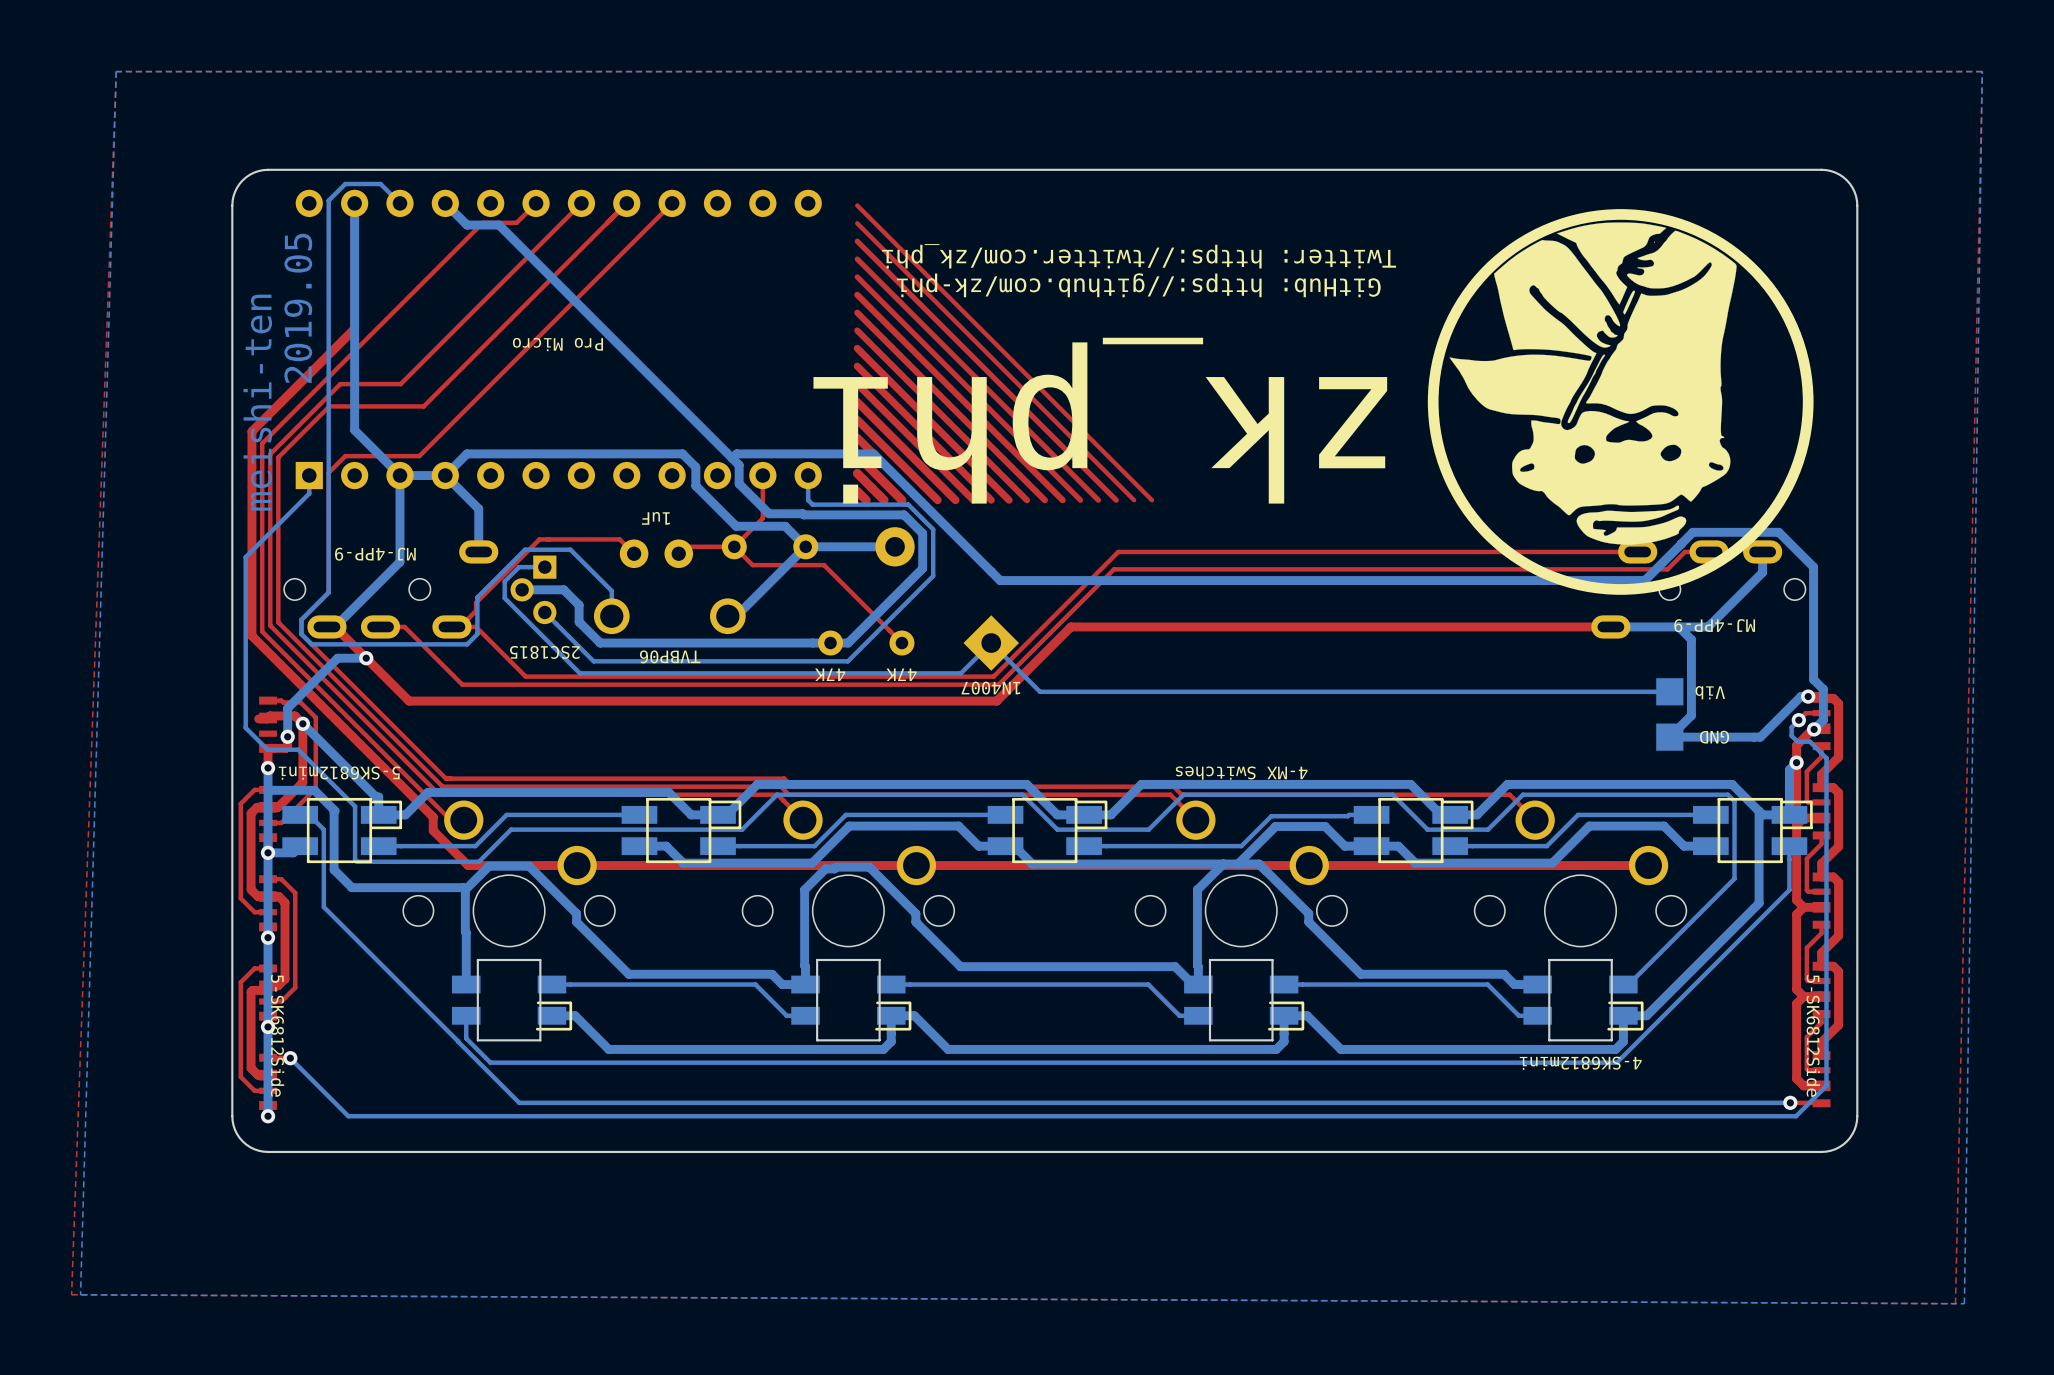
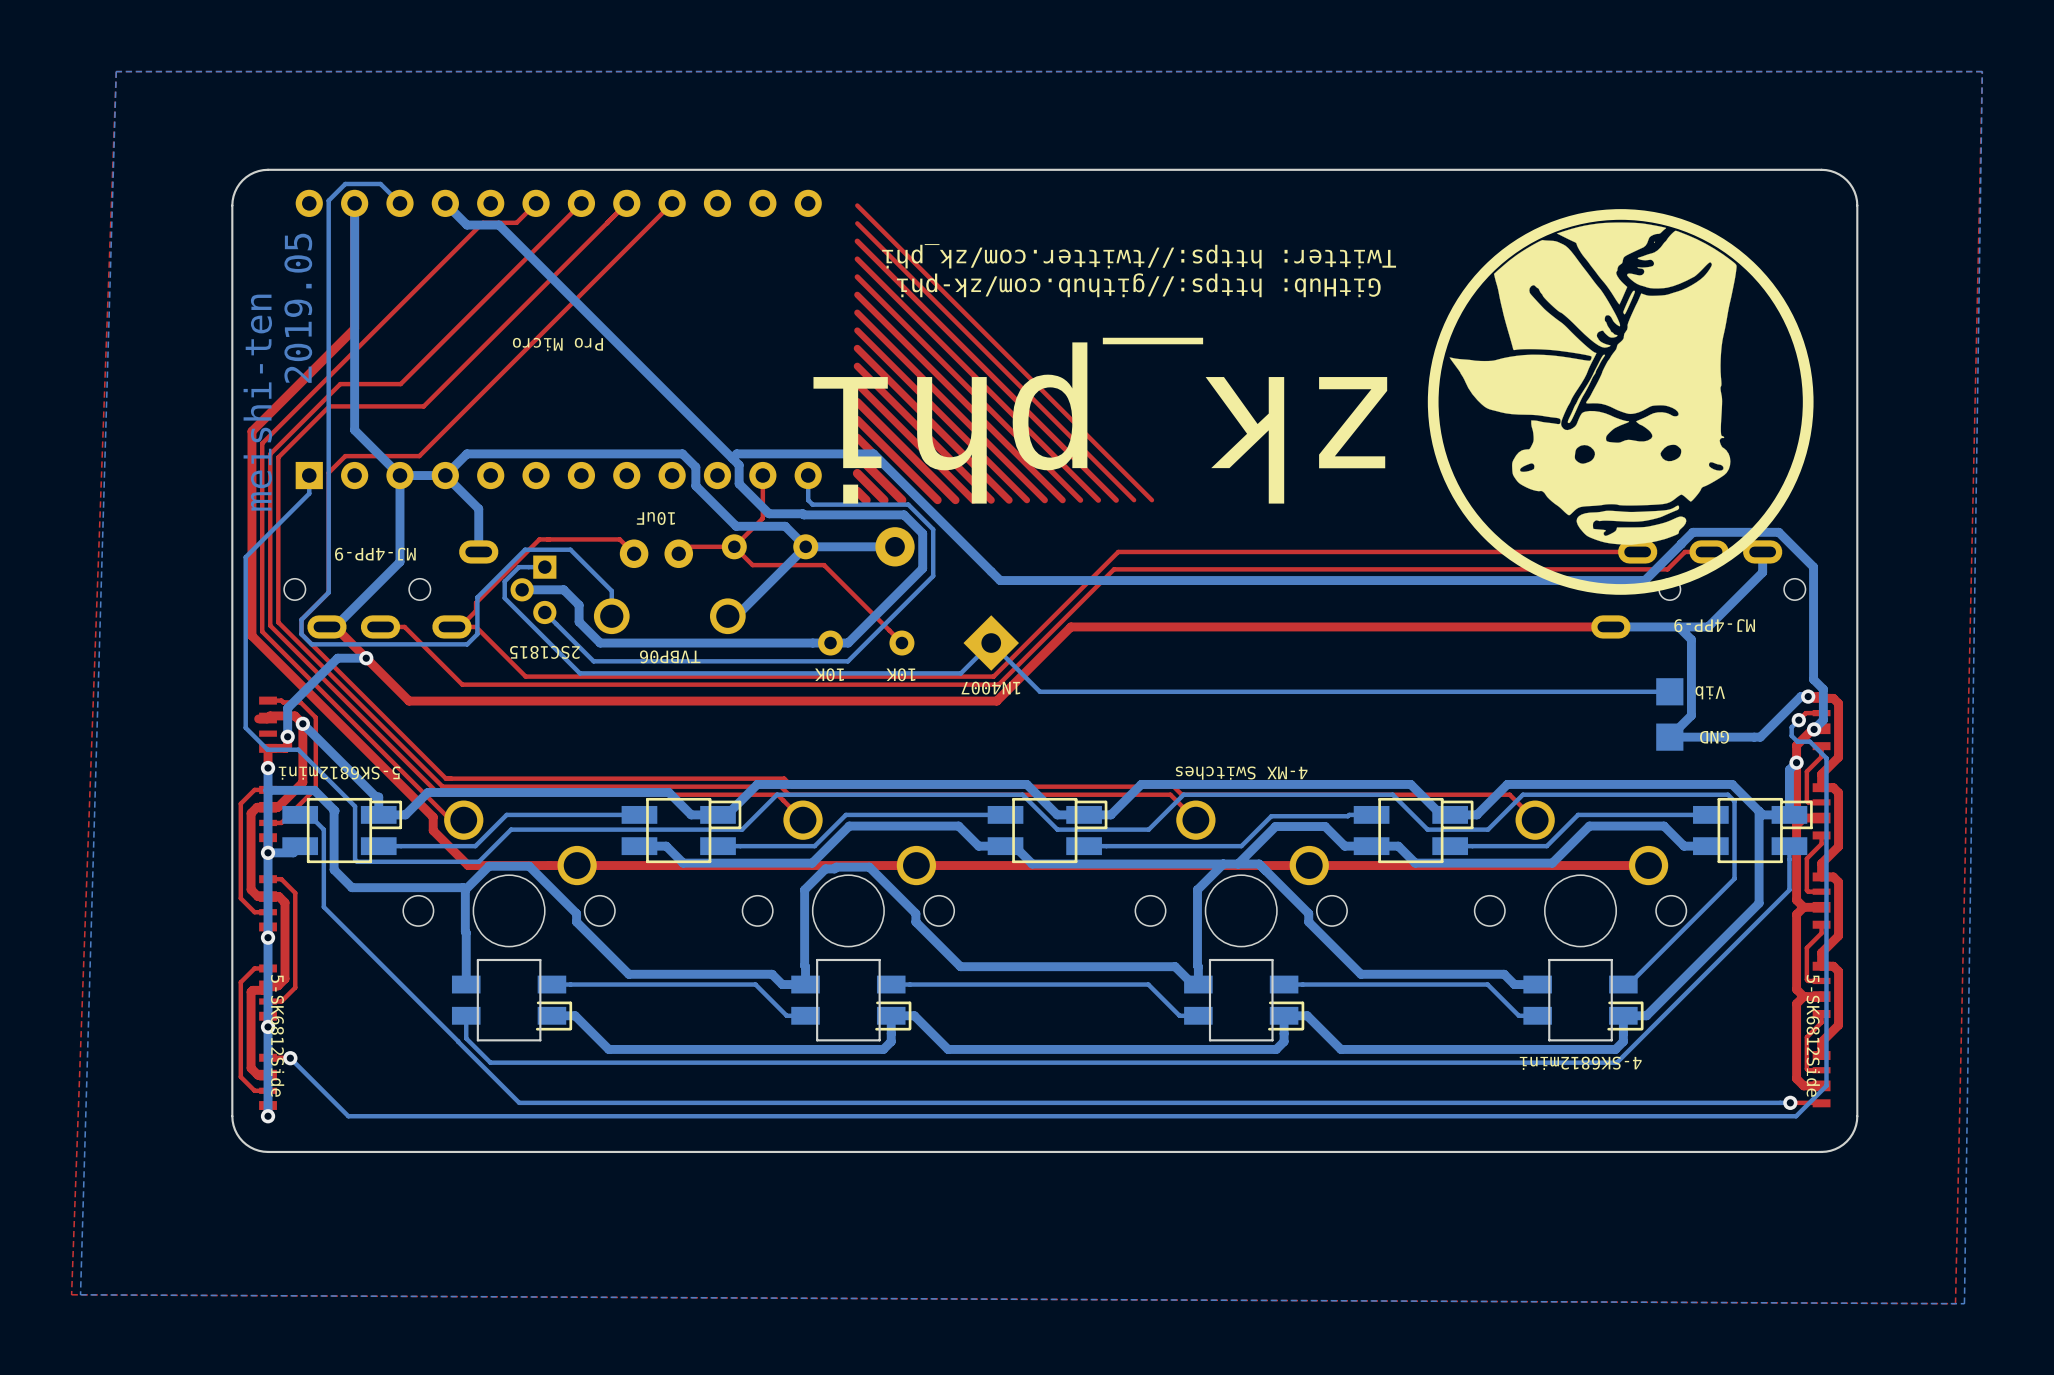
text: 1uF (655, 518) -> 10uF (655, 518)
text: 47K (830, 674) -> 10K (829, 674)
text: 47K (901, 674) -> 10K (900, 674)

